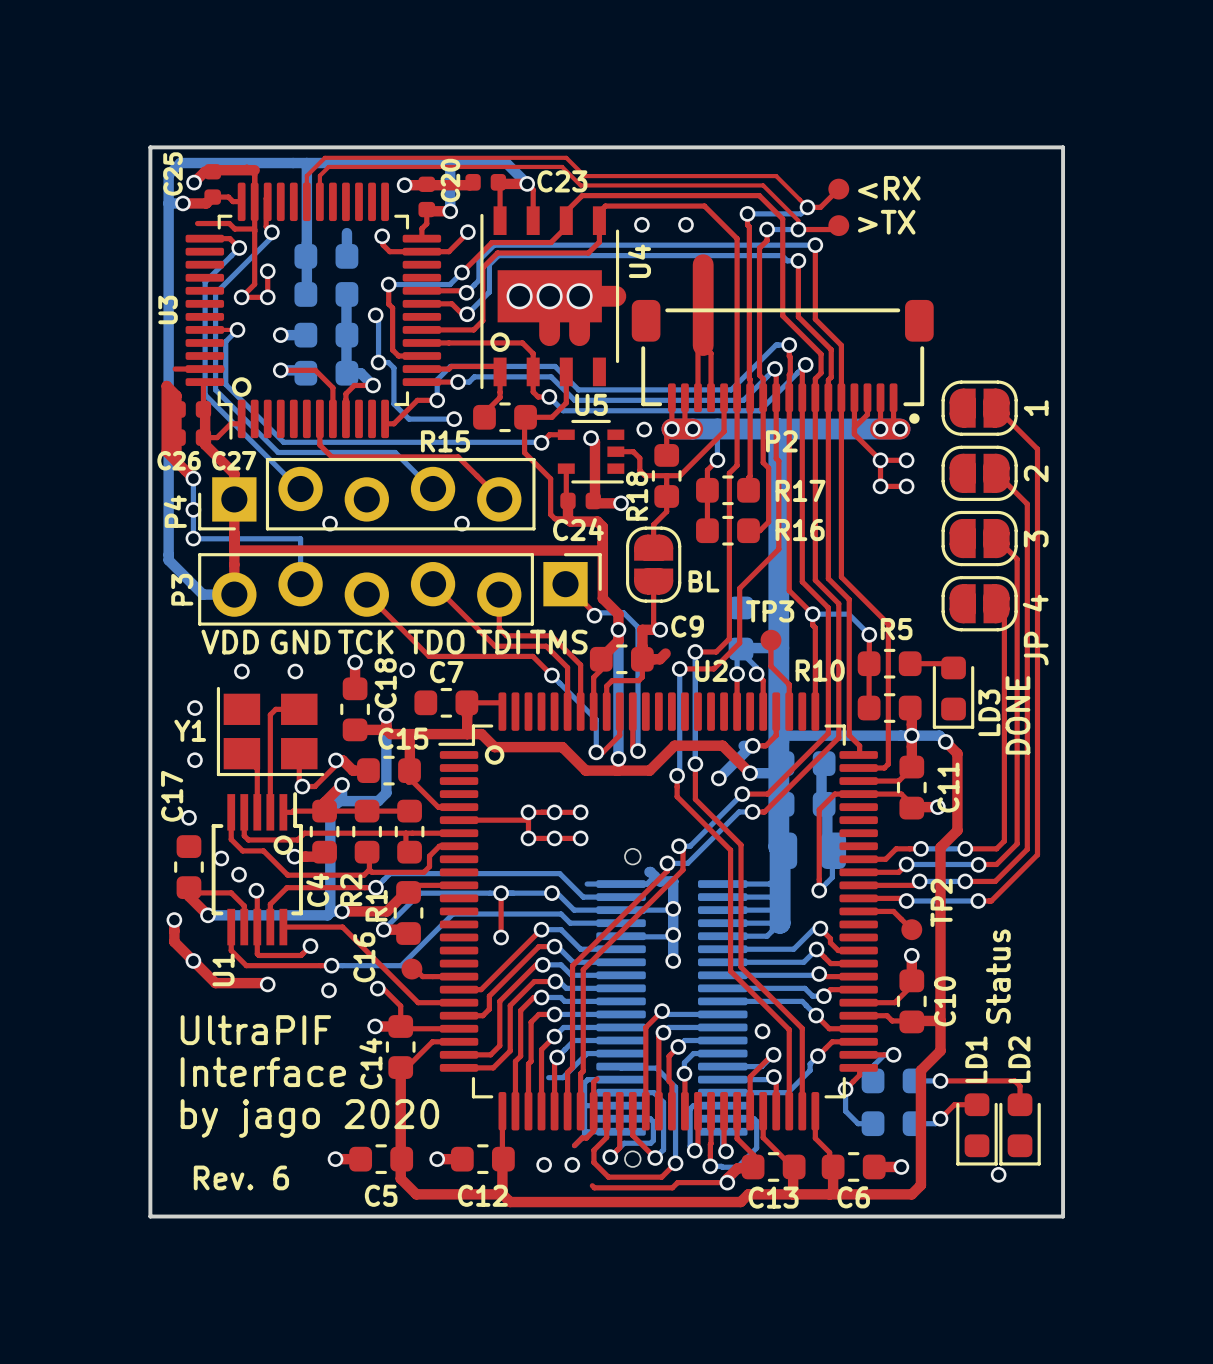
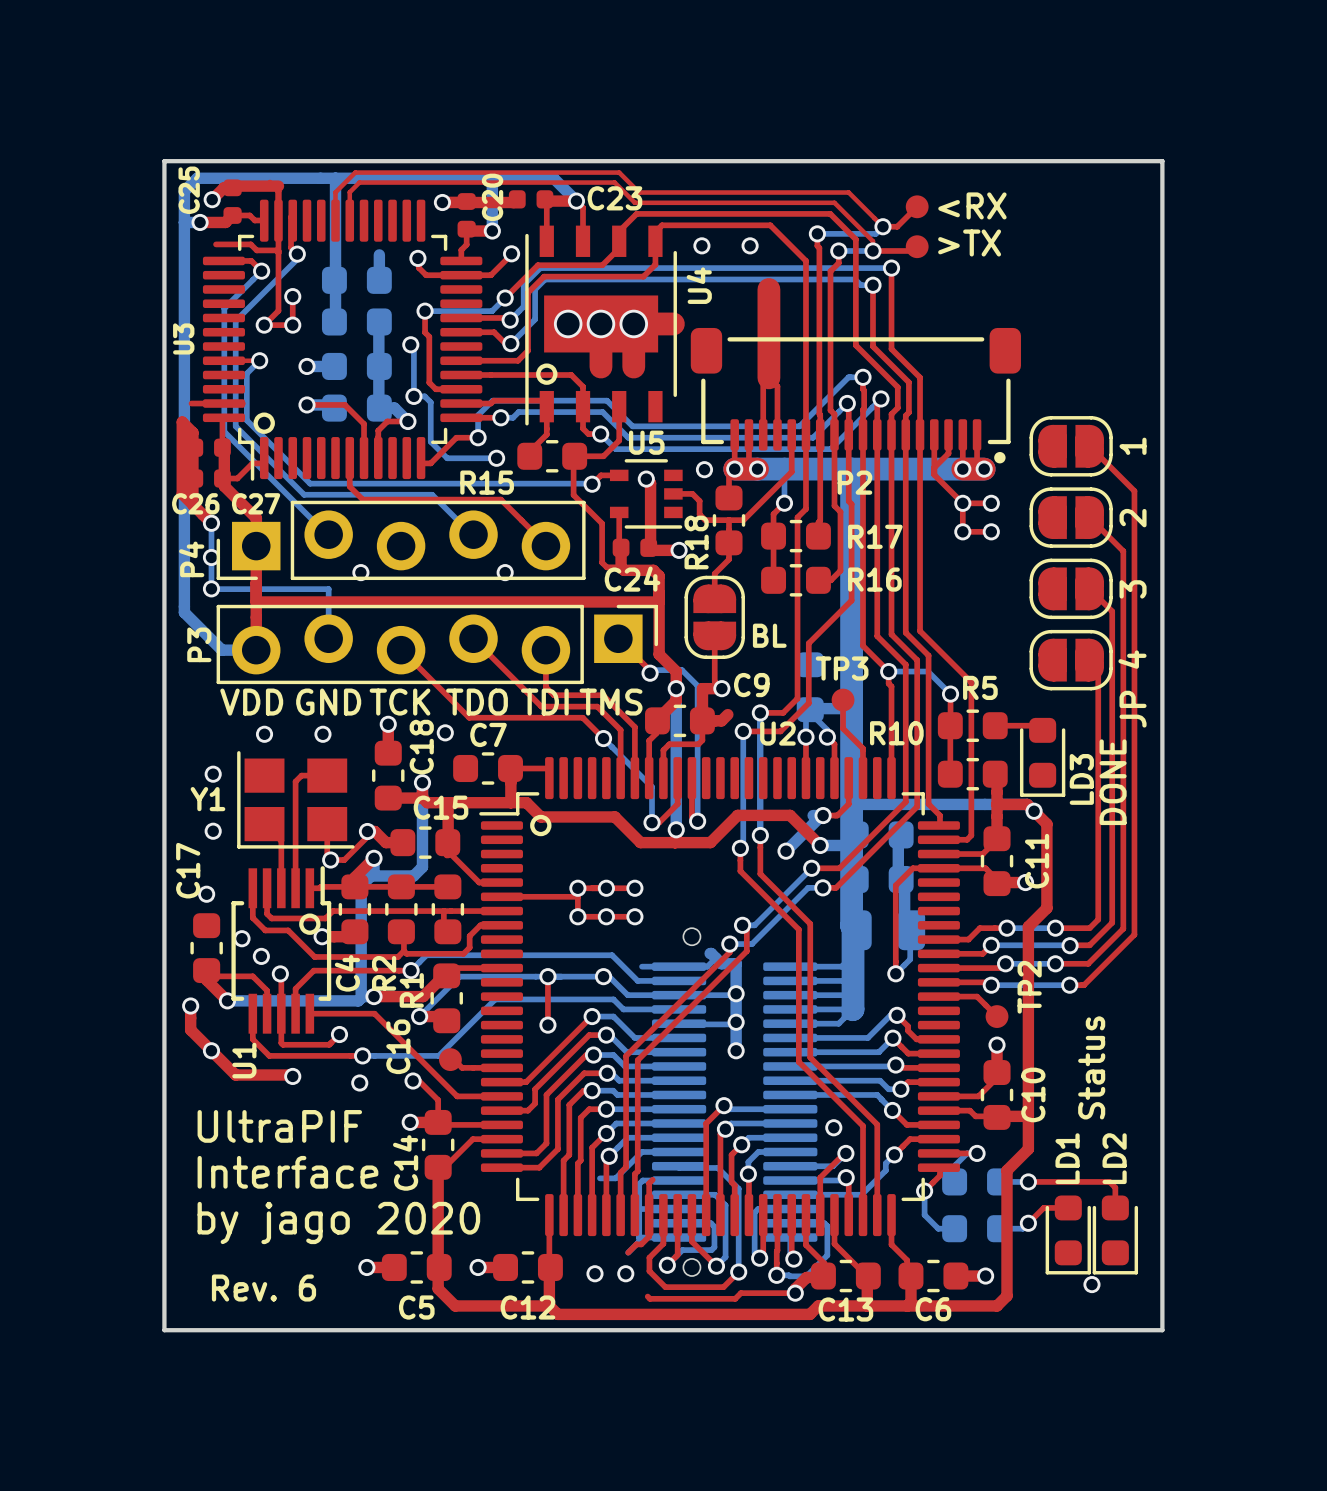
top track: none -> (997, 804) (1027, 804) (1034, 811)
via: (911, 735) -> none

